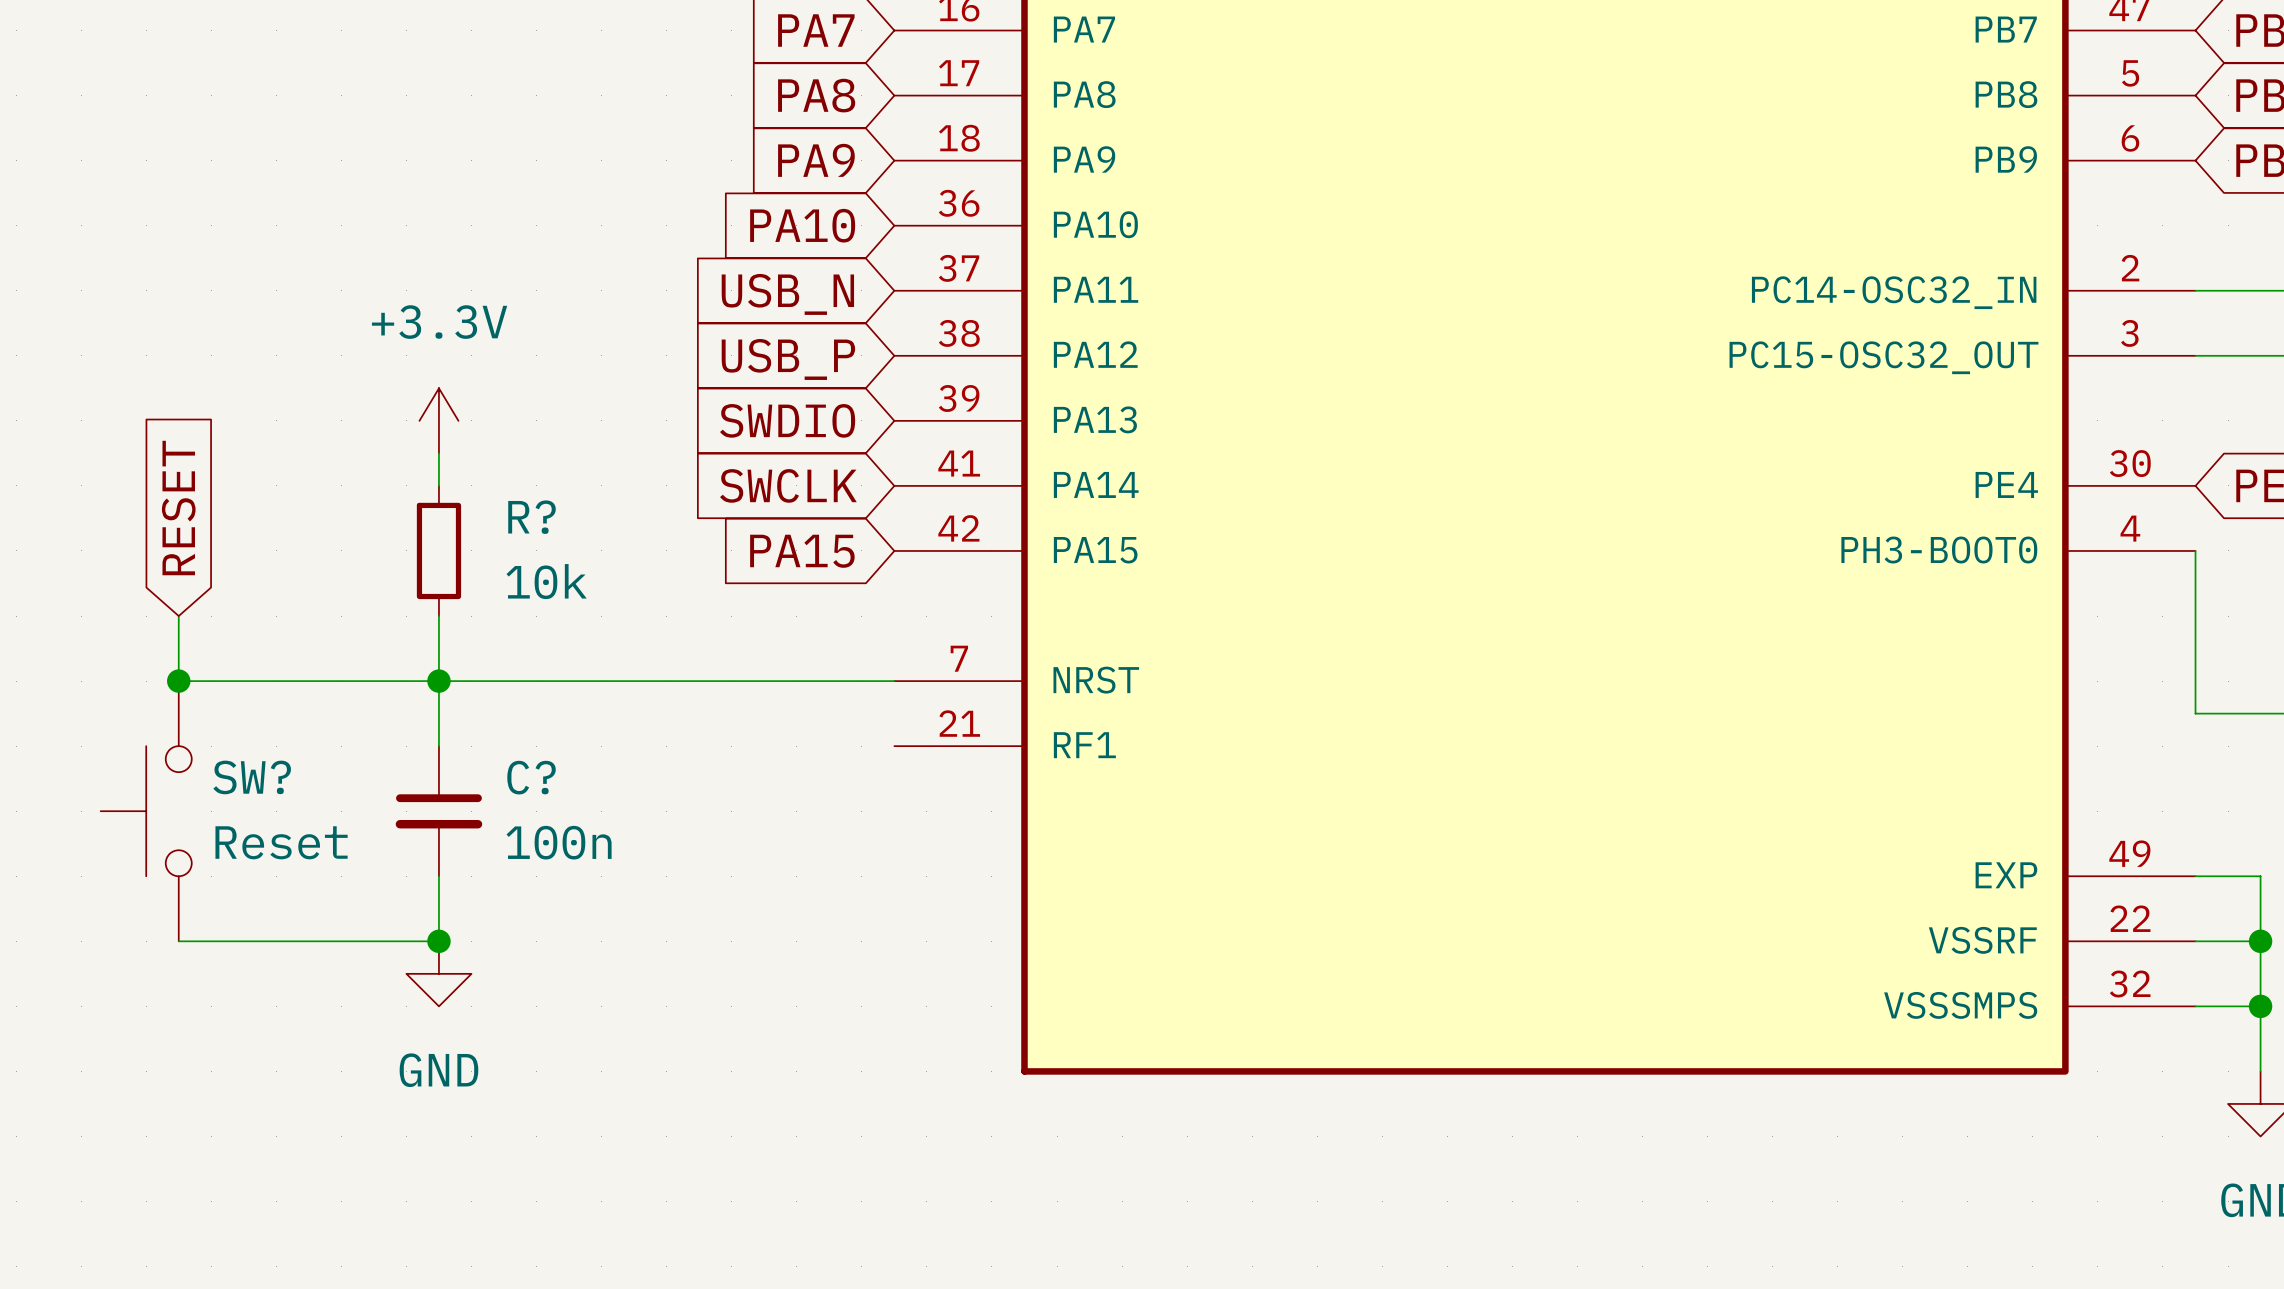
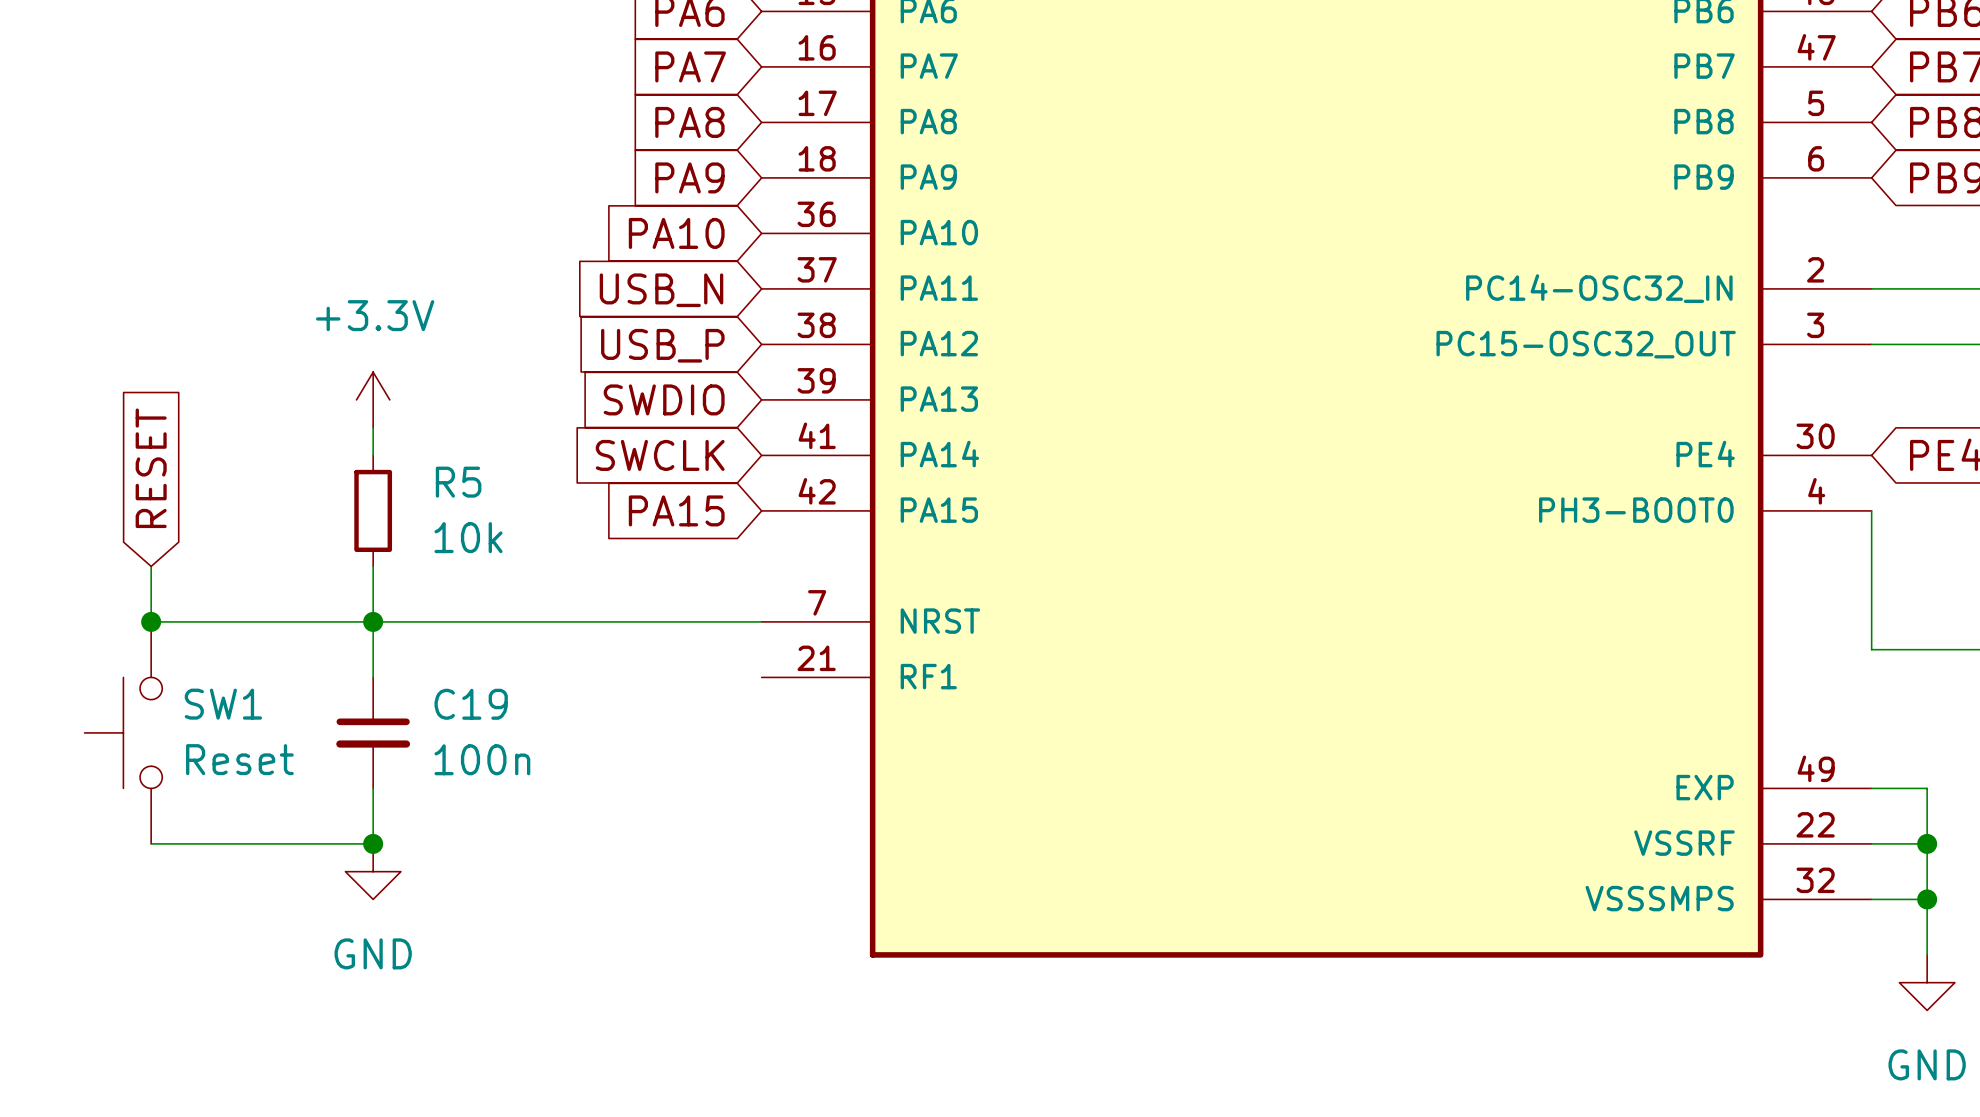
R? name: R? (531, 517) -> R5 (458, 482)
SW? name: SW? (252, 777) -> SW1 (223, 704)
C? name: C? (531, 777) -> C19 (471, 704)

